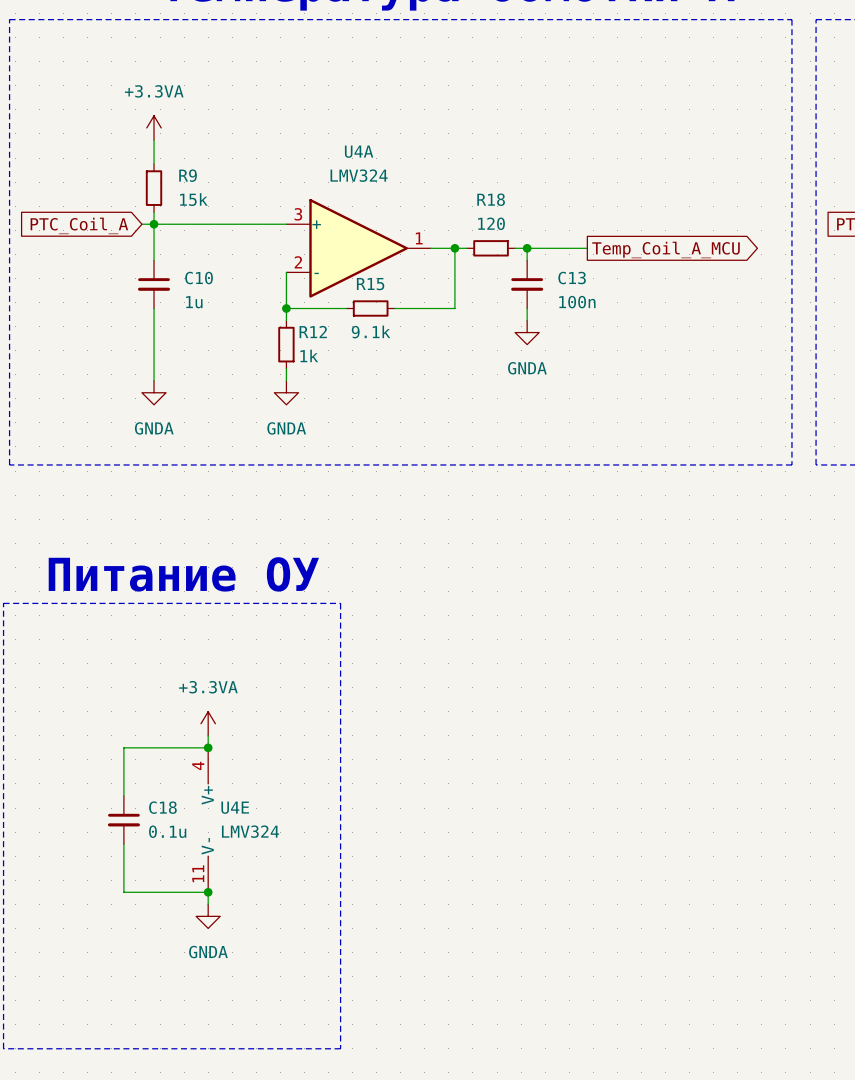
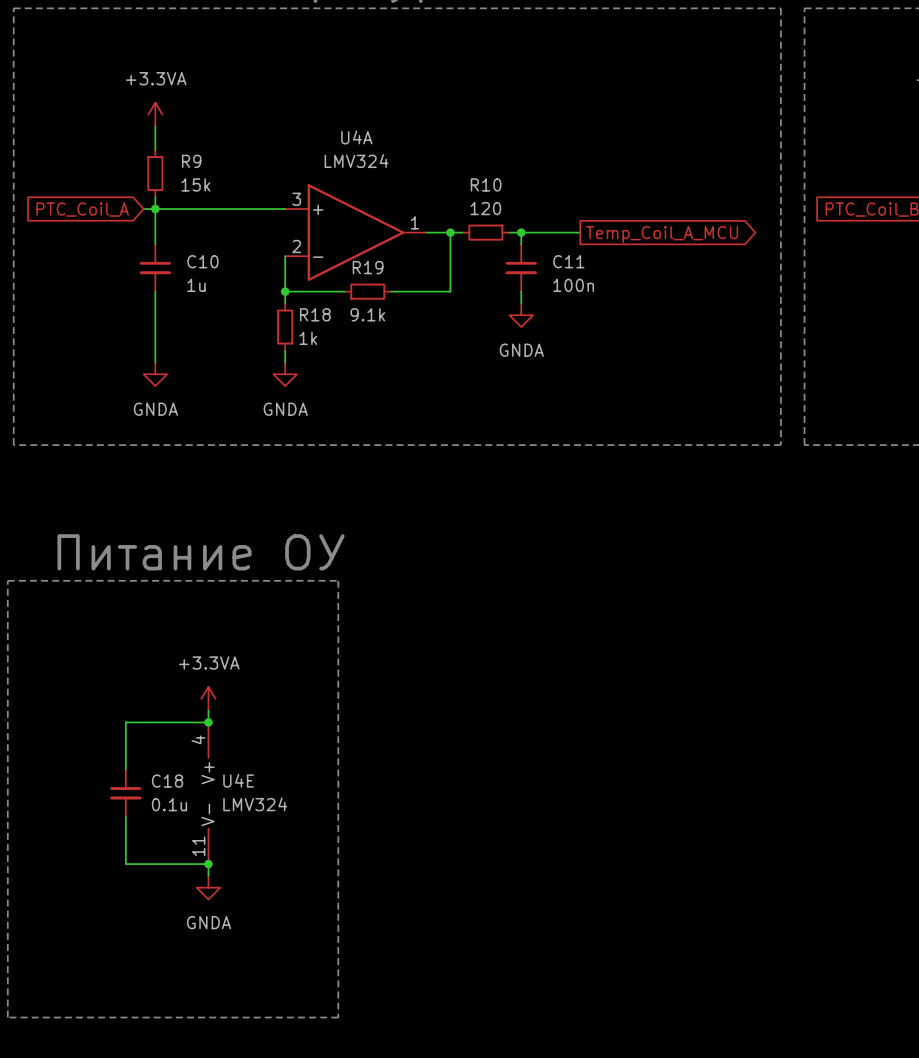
R18 name: R18 (491, 199) -> R10 (486, 184)
C13 name: C13 (572, 278) -> C11 (568, 261)
R15 name: R15 (370, 284) -> R19 (368, 267)
R12 name: R12 (313, 332) -> R18 (315, 314)

